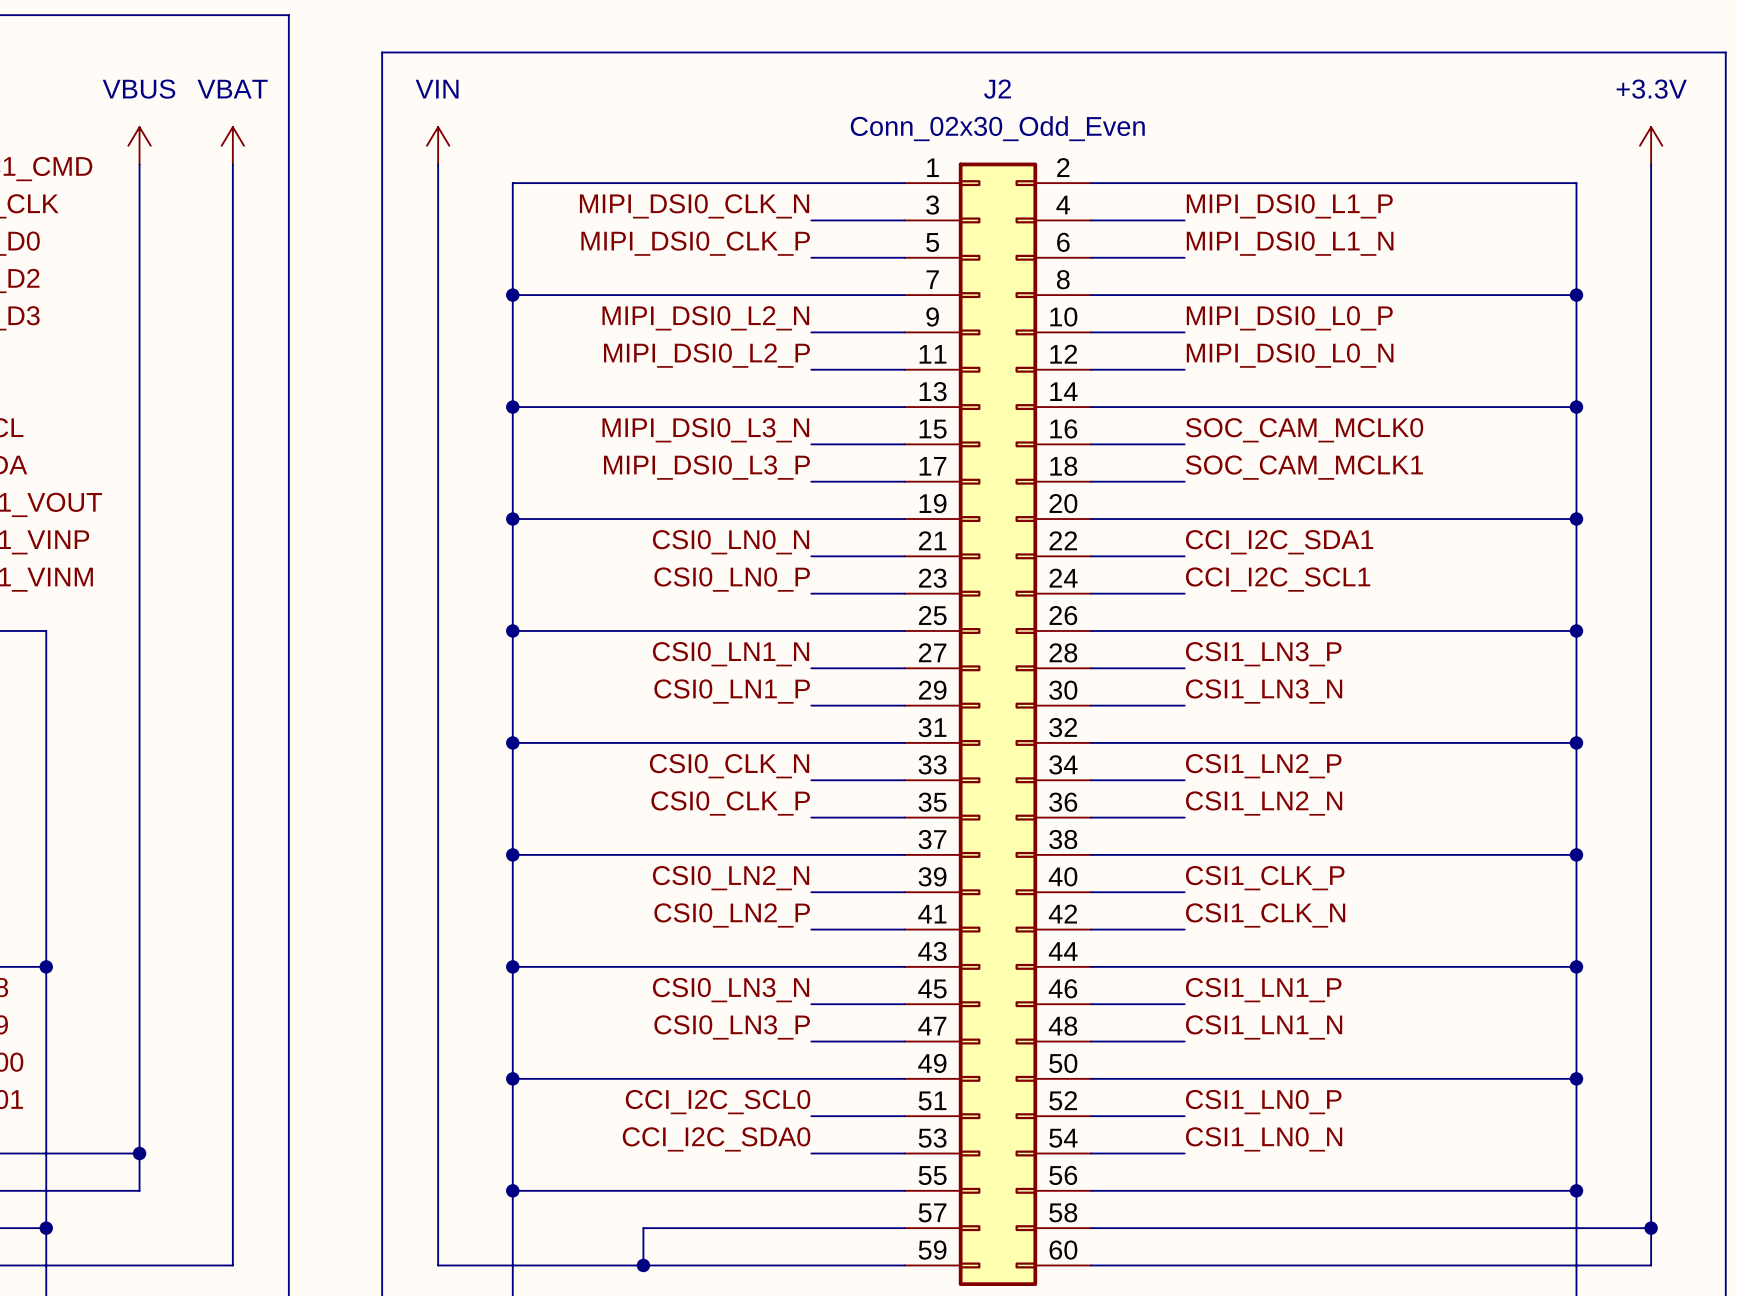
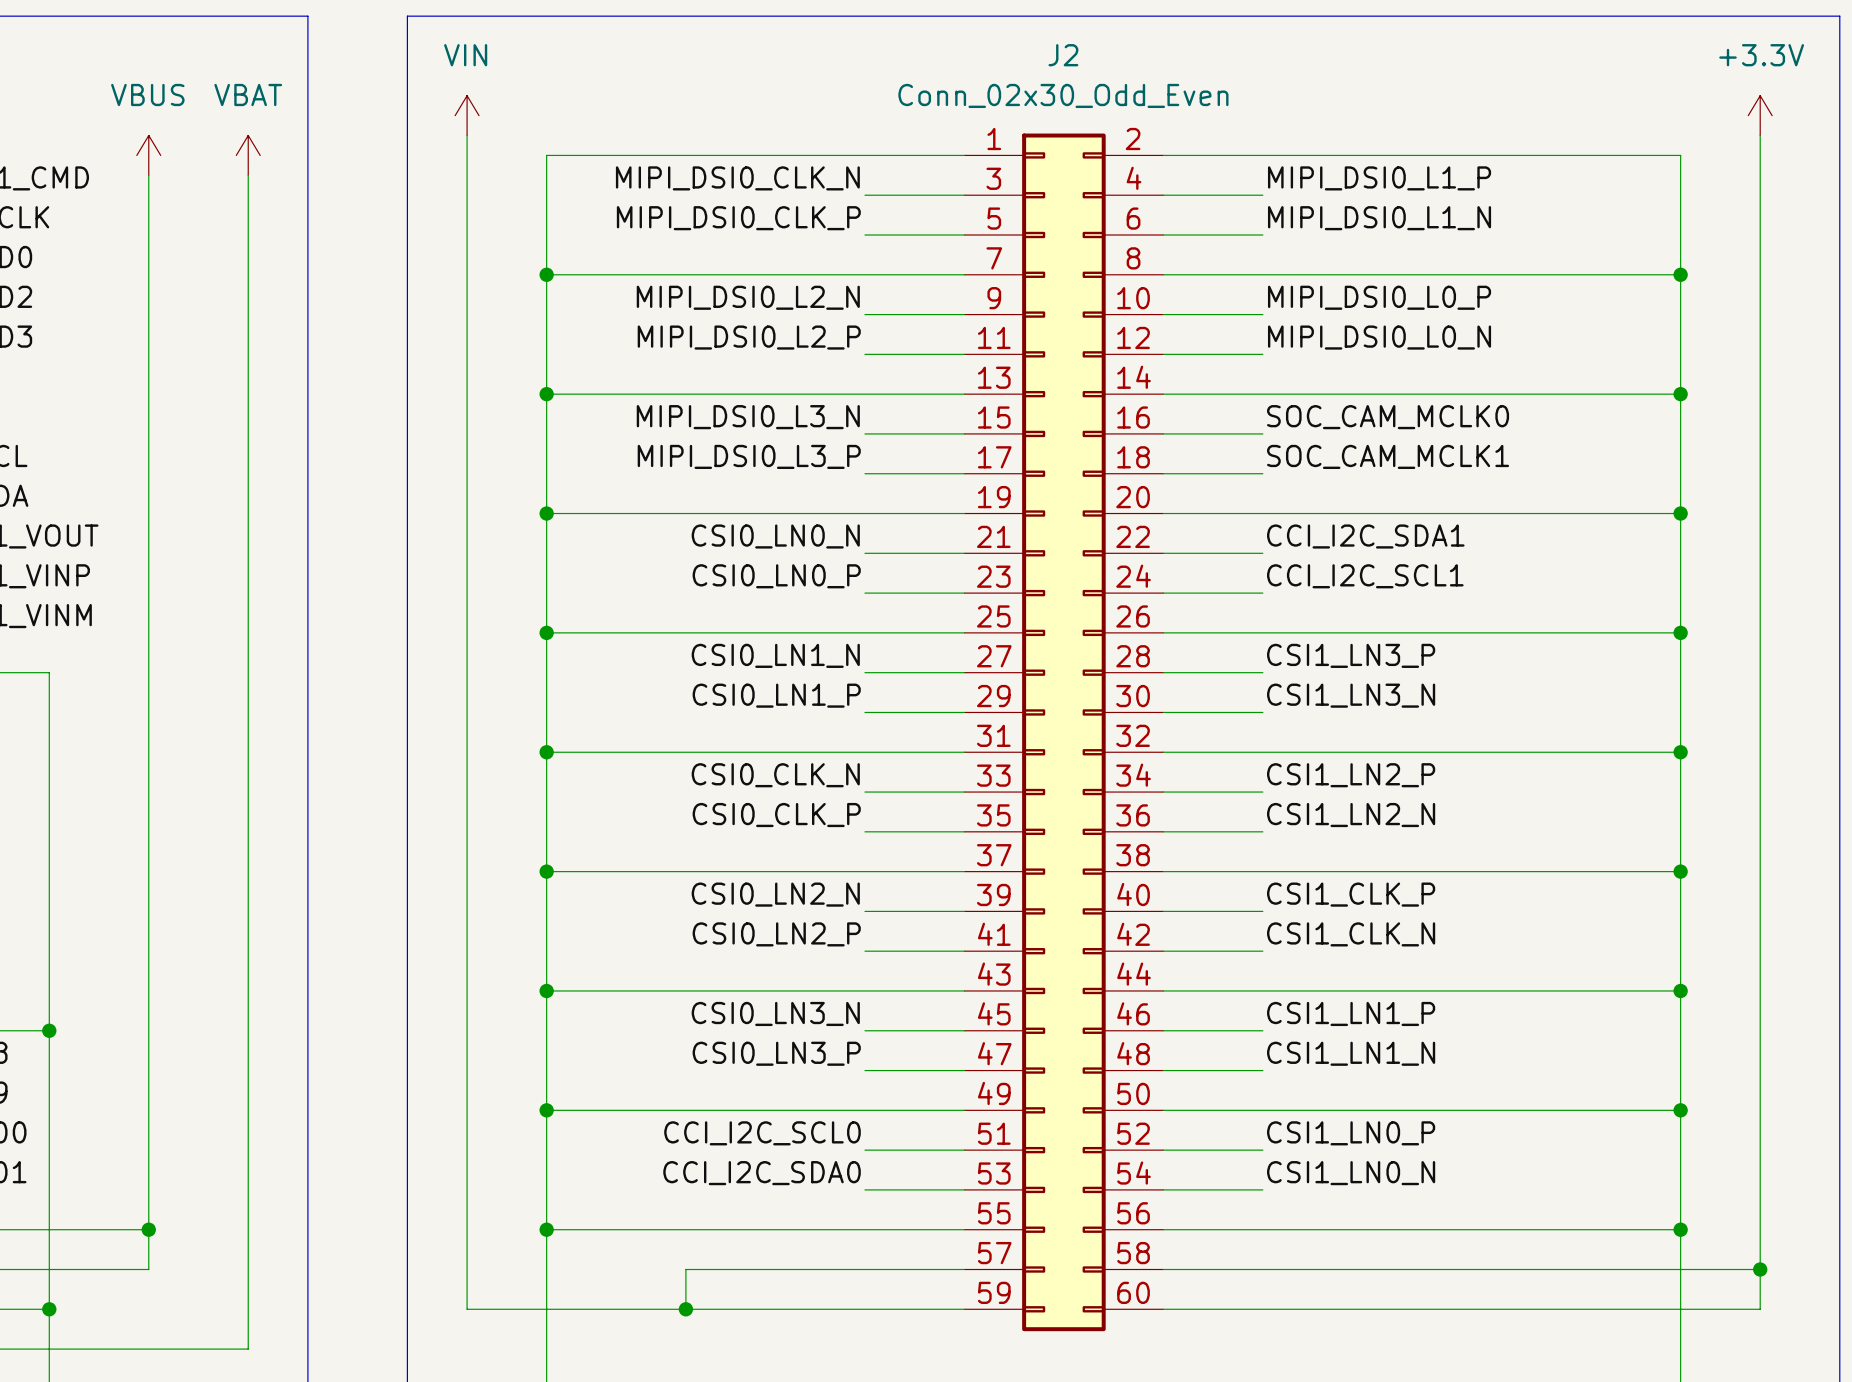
line: (382, 52) (1725, 52) -> (407, 55) (407, 16) (1839, 16) (1839, 55)
power symbol position: VIN (438, 145) -> VIN (467, 115)
power symbol position: +3.3V (1651, 145) -> +3.3V (1760, 115)
label: none -> MIPI_DSI0_CLK_N (737, 178)
label: none -> MIPI_DSI0_L1_P (1379, 178)
wire: (512, 183) (811, 183) -> (546, 195) (546, 155) (964, 155)
wire: (1184, 183) (1576, 183) -> (1163, 155) (1680, 155) (1680, 195)
label: MIPI_DSI0_CLK_N (694, 206) -> MIPI_DSI0_CLK_P (738, 218)
label: MIPI_DSI0_L1_P (1289, 206) -> MIPI_DSI0_L1_N (1379, 218)
label: MIPI_DSI0_CLK_P (695, 243) -> MIPI_DSI0_L2_N (748, 297)
label: MIPI_DSI0_L1_N (1290, 243) -> MIPI_DSI0_L0_P (1379, 297)
wire: none -> (546, 274) (864, 274)
junction: none -> (546, 274)
wire: none -> (1262, 274) (1680, 274)
junction: none -> (1680, 274)
wire: (512, 295) (811, 295) -> (546, 394) (864, 394)
junction: (512, 295) -> none
wire: (1184, 295) (1576, 295) -> (1262, 394) (1680, 394)
junction: (1576, 295) -> none
label: MIPI_DSI0_L2_N (705, 318) -> MIPI_DSI0_L2_P (749, 337)
label: MIPI_DSI0_L0_P (1289, 318) -> MIPI_DSI0_L0_N (1379, 337)
label: MIPI_DSI0_L2_P (706, 355) -> MIPI_DSI0_L3_N (748, 417)
label: MIPI_DSI0_L0_N (1290, 355) -> none
junction: none -> (546, 394)
junction: none -> (1680, 394)
label: none -> SOC_CAM_MCLK0 (1388, 417)
wire: (512, 407) (811, 407) -> (546, 513) (864, 513)
junction: (512, 407) -> none
wire: (1184, 407) (1576, 407) -> (1262, 513) (1680, 513)
junction: (1576, 407) -> none
label: MIPI_DSI0_L3_N (705, 430) -> MIPI_DSI0_L3_P (749, 456)
label: SOC_CAM_MCLK0 (1304, 430) -> SOC_CAM_MCLK1 (1388, 456)
label: MIPI_DSI0_L3_P (706, 467) -> none
label: SOC_CAM_MCLK1 (1304, 467) -> none
junction: none -> (546, 513)
junction: none -> (1680, 513)
label: none -> CSI0_LN0_N (775, 536)
label: none -> CCI_I2C_SDA1 (1365, 536)
wire: (512, 519) (811, 519) -> (546, 632) (864, 632)
junction: (512, 519) -> none
wire: (1184, 519) (1576, 519) -> (1262, 632) (1680, 632)
junction: (1576, 519) -> none
label: CSI0_LN0_N (731, 542) -> CSI0_LN0_P (776, 576)
label: CCI_I2C_SDA1 (1279, 542) -> CCI_I2C_SCL1 (1365, 576)
label: CSI0_LN0_P (732, 579) -> CSI0_LN1_N (775, 655)
label: CCI_I2C_SCL1 (1278, 579) -> none
junction: none -> (546, 632)
junction: none -> (1680, 632)
label: none -> CSI1_LN3_P (1351, 655)
wire: (512, 630) (811, 630) -> (546, 752) (864, 752)
junction: (512, 630) -> none
wire: (1184, 630) (1576, 630) -> (1262, 752) (1680, 752)
junction: (1576, 630) -> none
label: CSI0_LN1_N (731, 654) -> CSI0_LN1_P (776, 695)
label: CSI1_LN3_P (1263, 654) -> CSI1_LN3_N (1351, 695)
label: CSI0_LN1_P (732, 691) -> CSI0_CLK_N (775, 775)
label: CSI1_LN3_N (1264, 691) -> CSI1_LN2_P (1351, 775)
junction: none -> (546, 752)
junction: none -> (1680, 752)
J2 position: (997, 724) -> (1063, 732)
wire: (512, 742) (811, 742) -> (546, 871) (864, 871)
junction: (512, 742) -> none
wire: (1184, 742) (1576, 742) -> (1262, 871) (1680, 871)
junction: (1576, 742) -> none
label: CSI0_CLK_N (729, 766) -> CSI0_CLK_P (776, 815)
label: CSI1_LN2_P (1263, 766) -> CSI1_LN2_N (1351, 815)
label: CSI0_CLK_P (730, 803) -> CSI0_LN2_N (775, 894)
label: CSI1_LN2_N (1264, 803) -> CSI1_CLK_P (1351, 894)
junction: none -> (546, 871)
junction: none -> (1680, 871)
wire: (512, 854) (811, 854) -> (546, 990) (864, 990)
junction: (512, 854) -> none
wire: (1184, 854) (1576, 854) -> (1262, 990) (1680, 990)
junction: (1576, 854) -> none
label: CSI0_LN2_N (731, 878) -> CSI0_LN2_P (776, 934)
label: CSI1_CLK_P (1265, 878) -> CSI1_CLK_N (1351, 934)
label: CSI0_LN2_P (732, 915) -> CSI0_LN3_N (775, 1013)
label: CSI1_CLK_N (1265, 915) -> CSI1_LN1_P (1351, 1013)
junction: none -> (546, 990)
junction: none -> (1680, 990)
wire: (512, 966) (811, 966) -> (546, 1110) (864, 1110)
junction: (512, 966) -> none
wire: (1184, 966) (1576, 966) -> (1262, 1110) (1680, 1110)
junction: (1576, 966) -> none
label: CSI0_LN3_N (731, 990) -> CSI0_LN3_P (776, 1053)
label: CSI1_LN1_P (1263, 990) -> CSI1_LN1_N (1351, 1053)
label: CSI0_LN3_P (732, 1027) -> none
label: CSI1_LN1_N (1264, 1027) -> CSI1_LN0_P (1351, 1133)
junction: none -> (546, 1110)
junction: none -> (1680, 1110)
label: none -> CCI_I2C_SCL0 (762, 1133)
wire: (512, 1078) (811, 1078) -> (546, 1229) (864, 1229)
junction: (512, 1078) -> none
wire: (1184, 1078) (1576, 1078) -> (1262, 1229) (1680, 1229)
junction: (1576, 1078) -> none
label: CCI_I2C_SCL0 (718, 1102) -> CCI_I2C_SDA0 (762, 1173)
label: CSI1_LN0_P (1263, 1102) -> CSI1_LN0_N (1351, 1173)
label: CCI_I2C_SDA0 (716, 1139) -> none
label: CSI1_LN0_N (1264, 1139) -> none
junction: none -> (546, 1229)
junction: none -> (1680, 1229)
wire: (512, 1190) (643, 1190) -> (467, 1309) (685, 1309) (685, 1269)
junction: (512, 1190) -> none
wire: none -> (1680, 1269) (1760, 1269)
junction: (1576, 1190) -> none
junction: none -> (1760, 1269)
wire: (438, 1228) (438, 1265) (904, 1265) -> none
wire: (643, 1228) (643, 1265) -> none
wire: (1651, 1228) (1651, 1265) (1091, 1265) -> none
junction: (1651, 1228) -> none
junction position: (643, 1265) -> (685, 1309)

